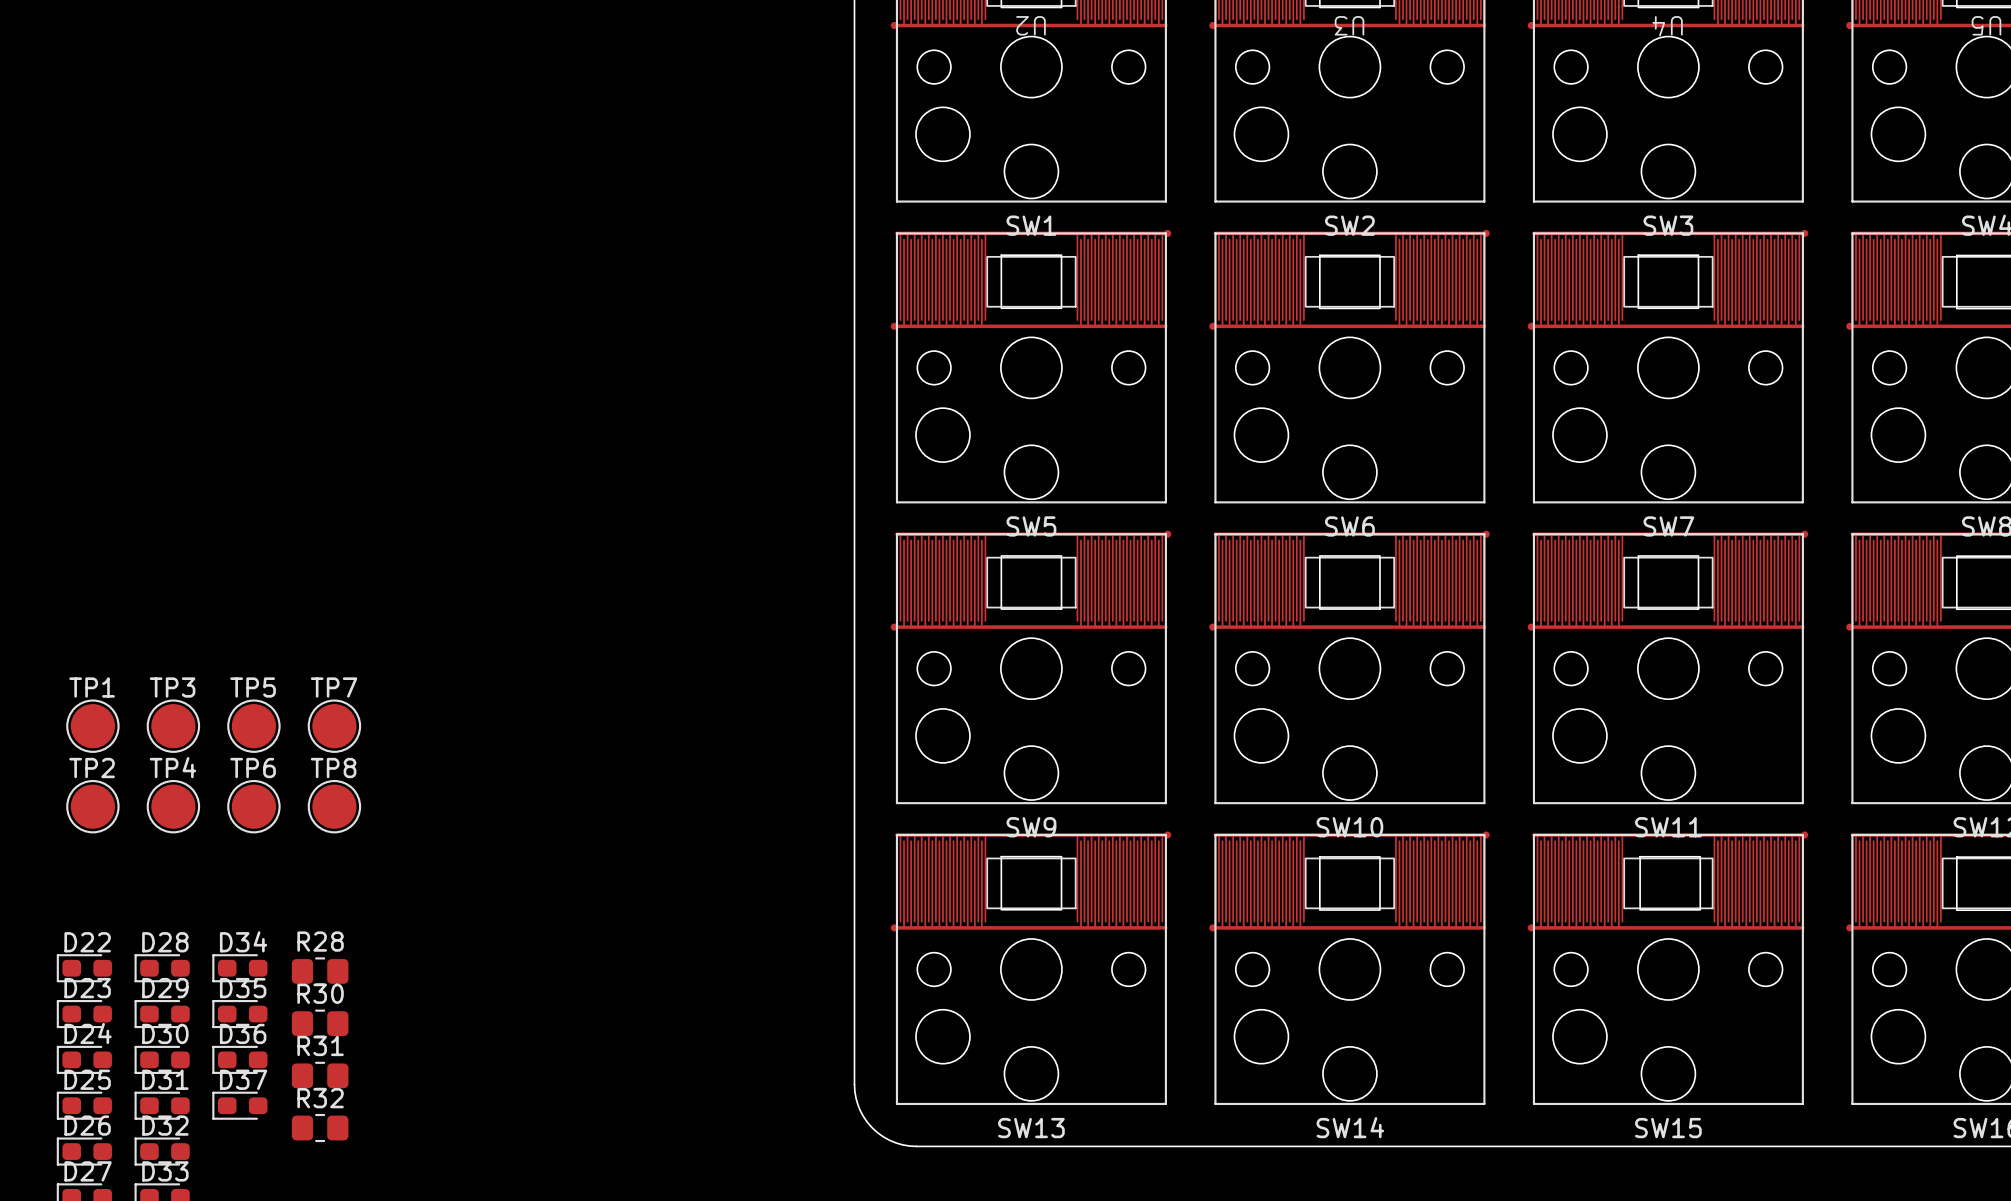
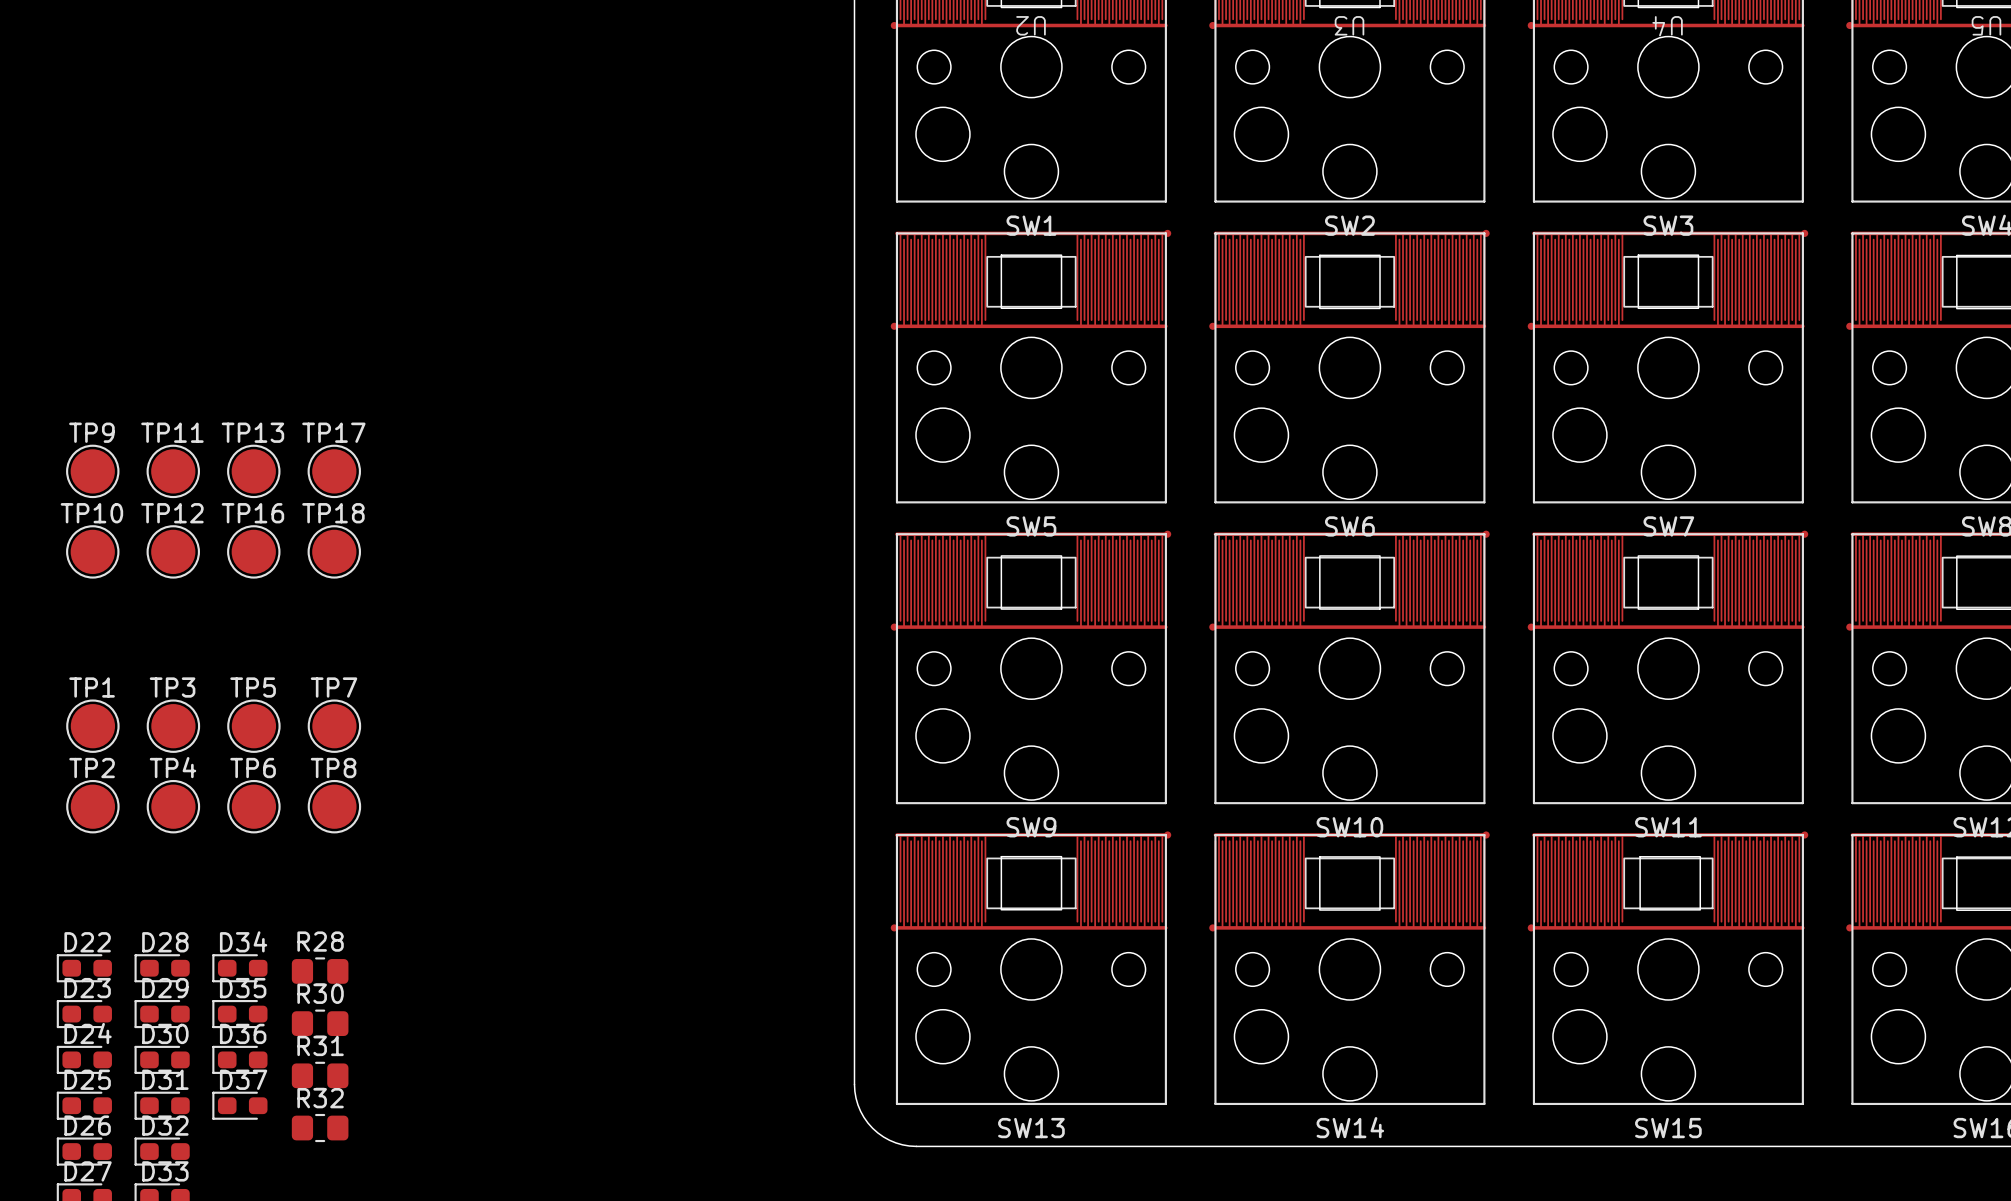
TP9: none -> (92, 471)
TP11: none -> (173, 471)
TP13: none -> (253, 471)
TP17: none -> (334, 471)
TP10: none -> (92, 551)
TP12: none -> (173, 551)
TP16: none -> (253, 551)
TP18: none -> (334, 551)

